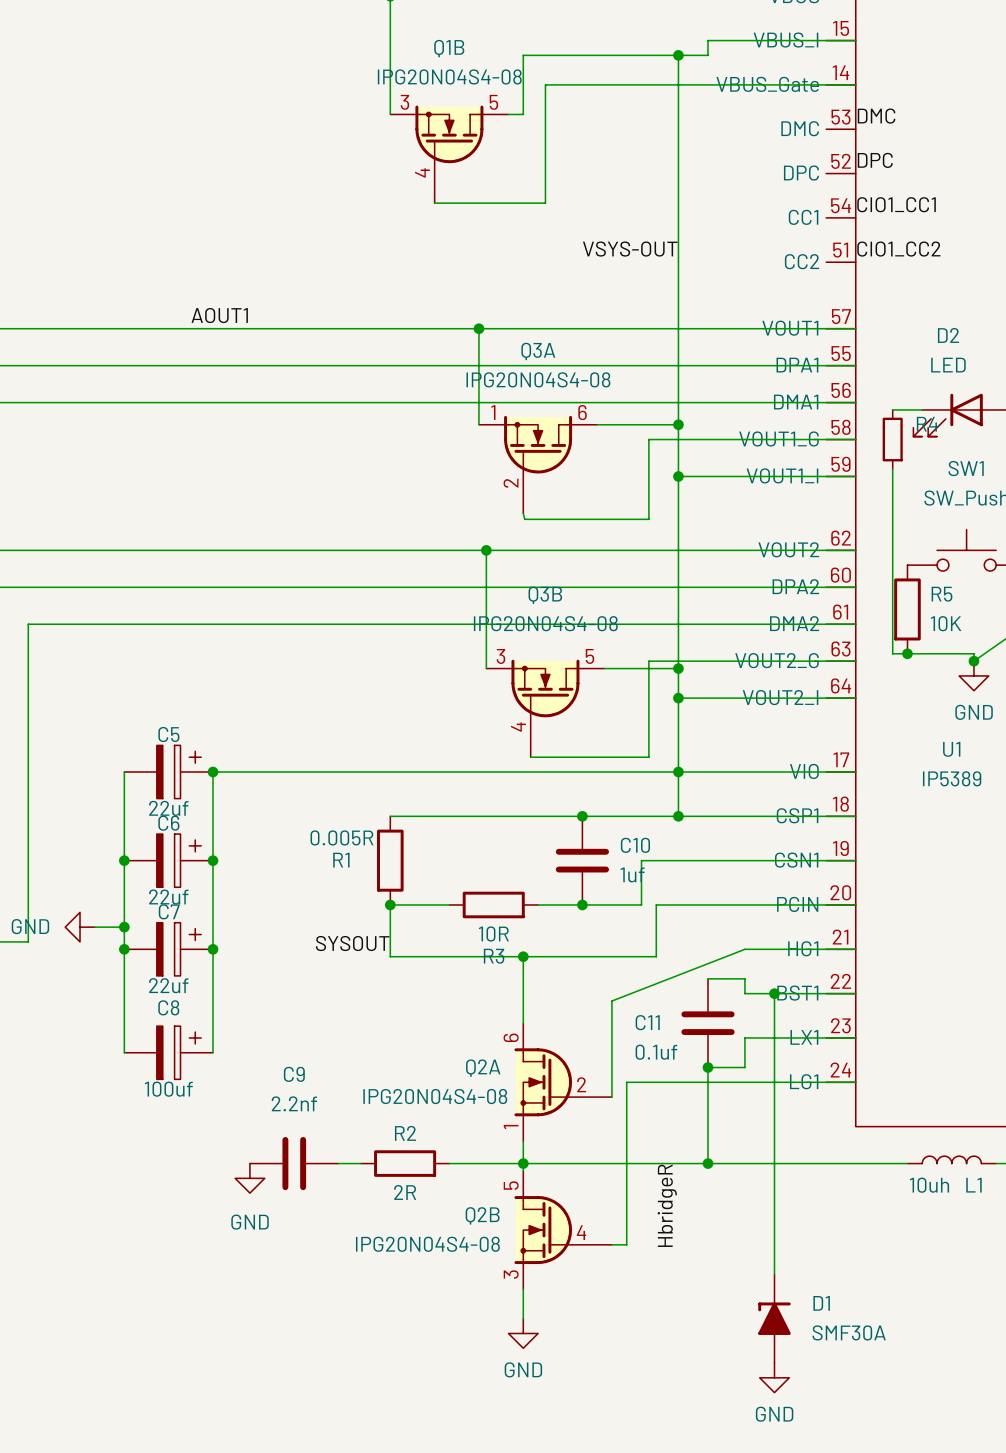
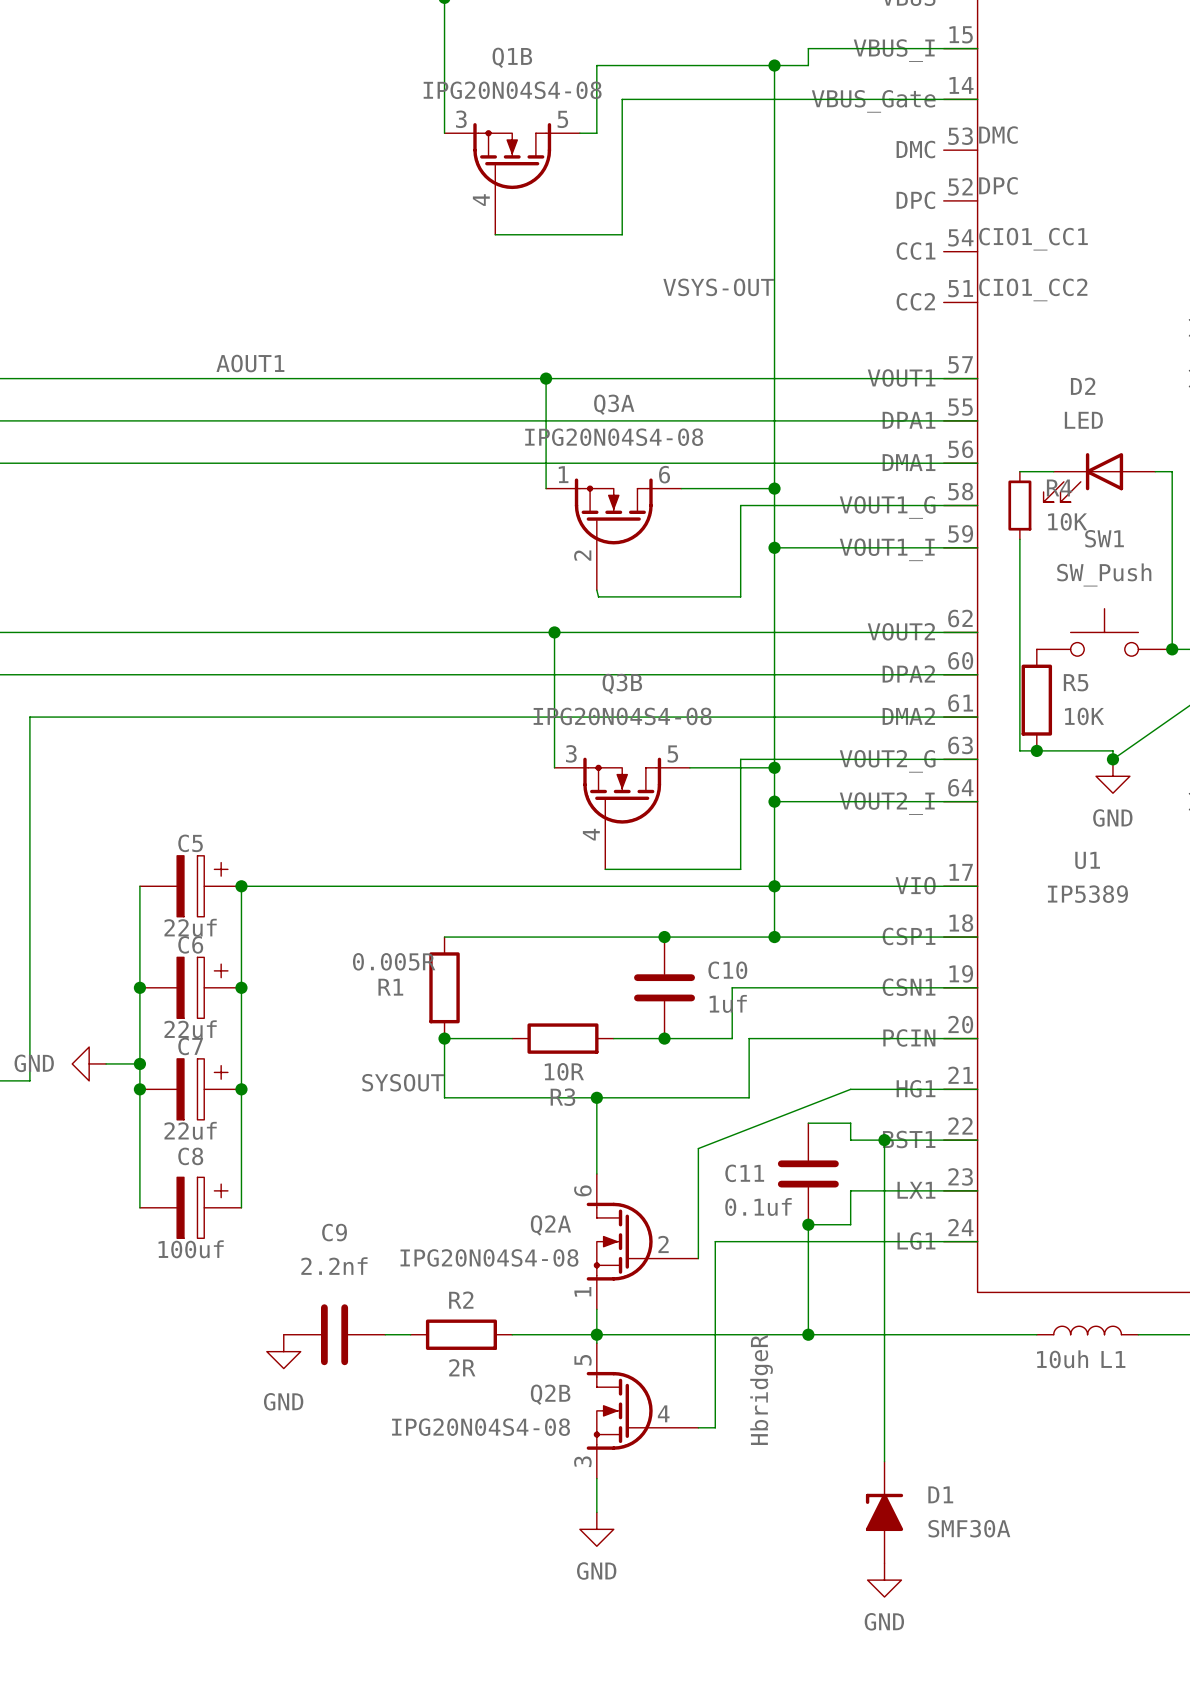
R4 value: none -> 10K (1067, 521)

